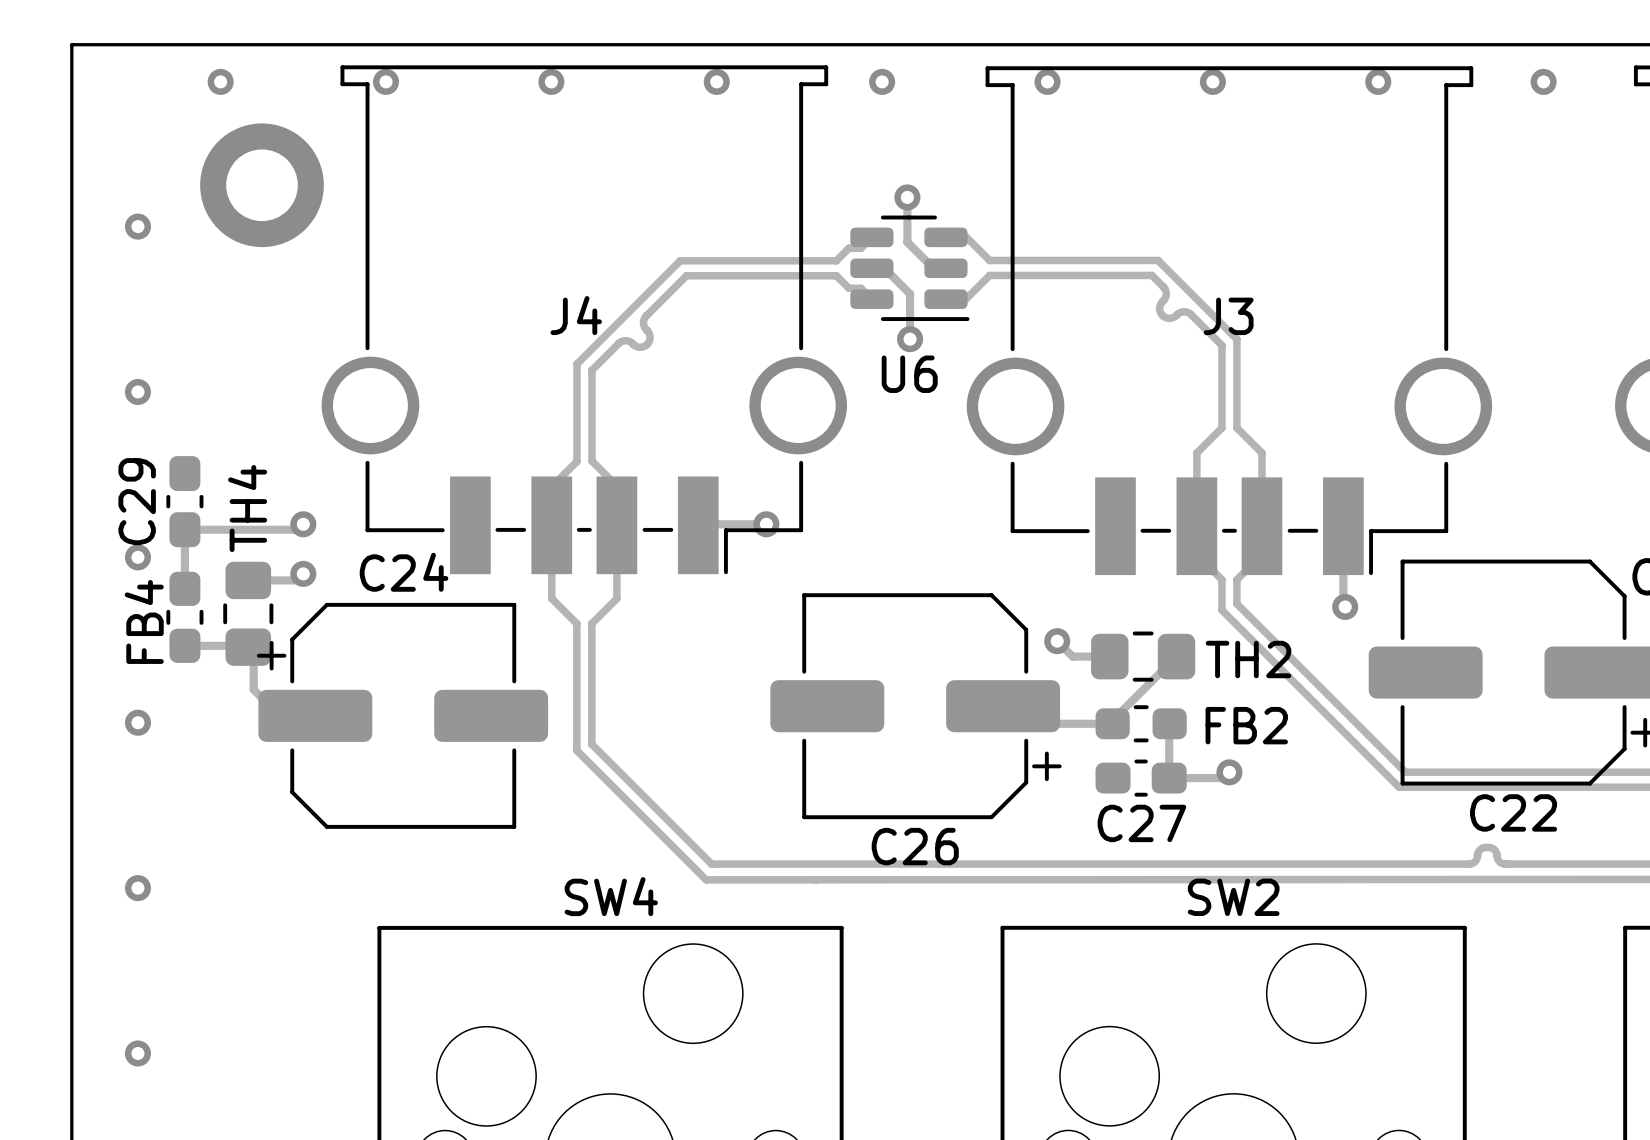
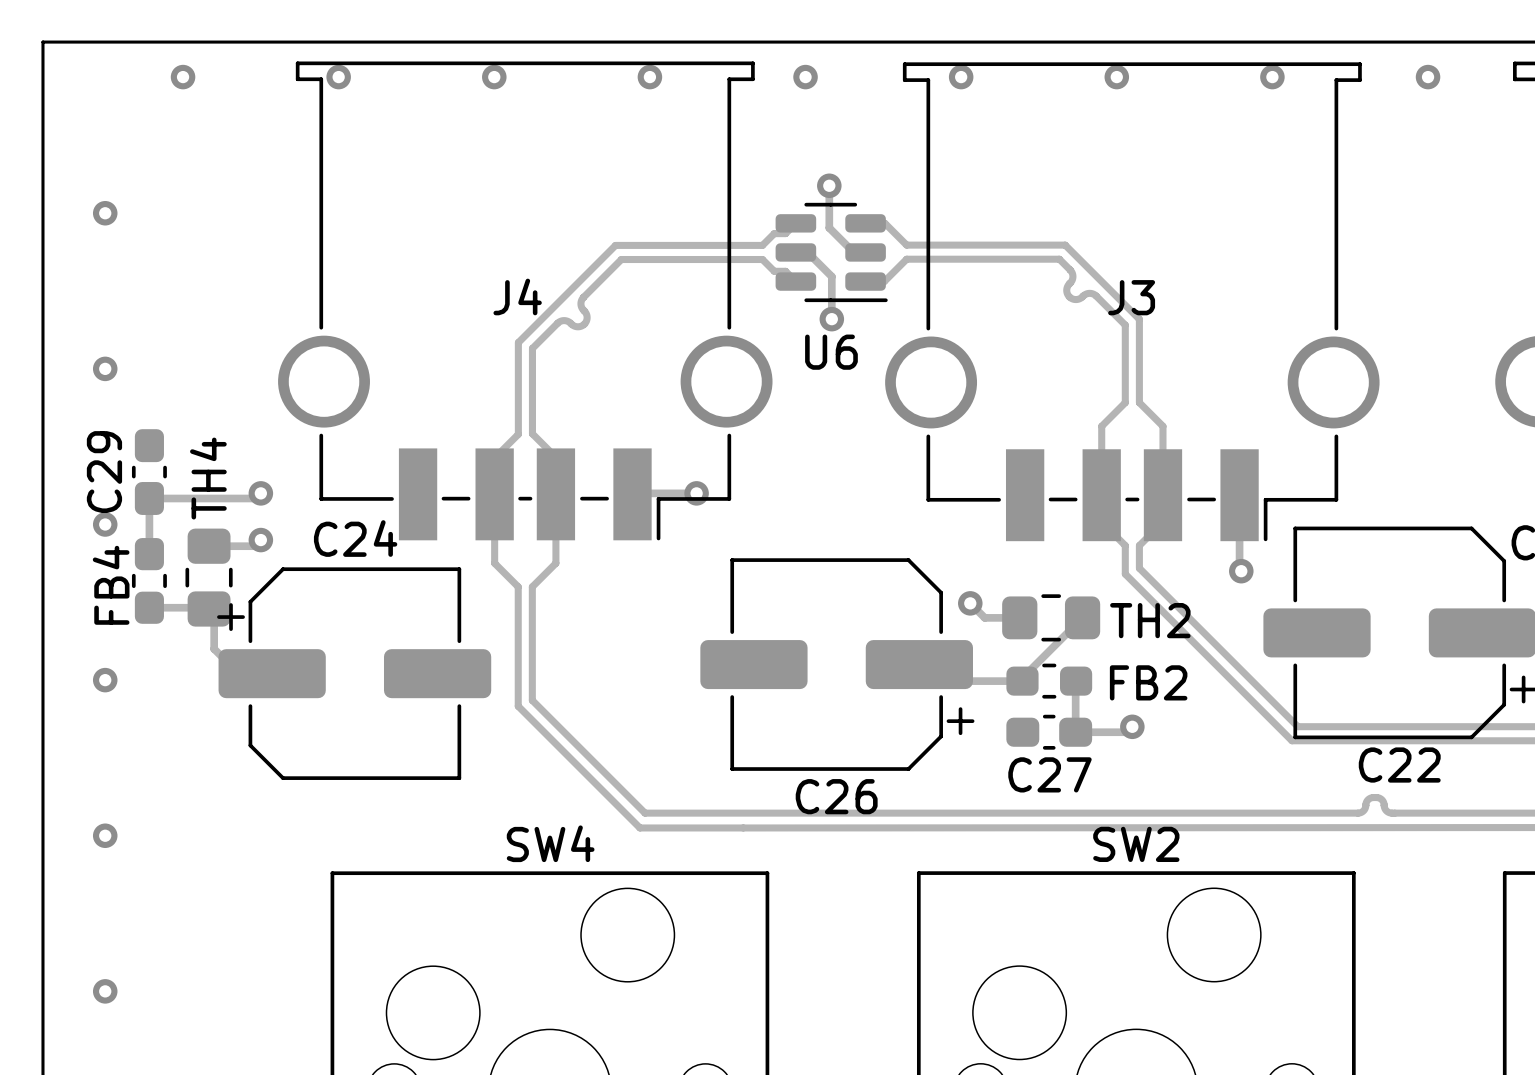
part: (261, 185) -> none

